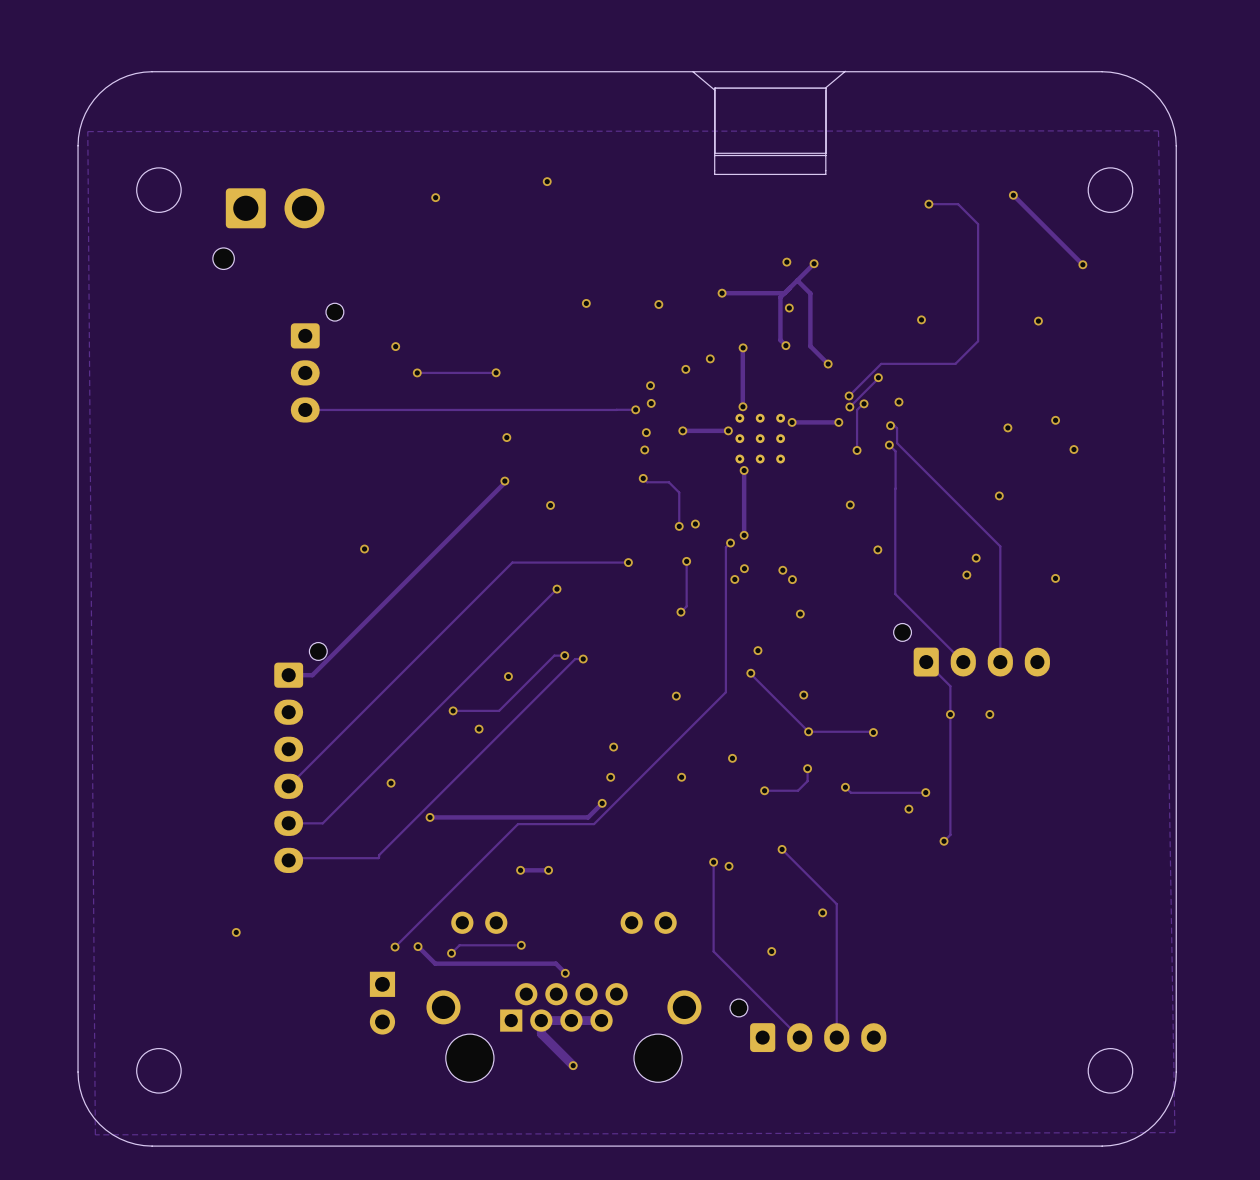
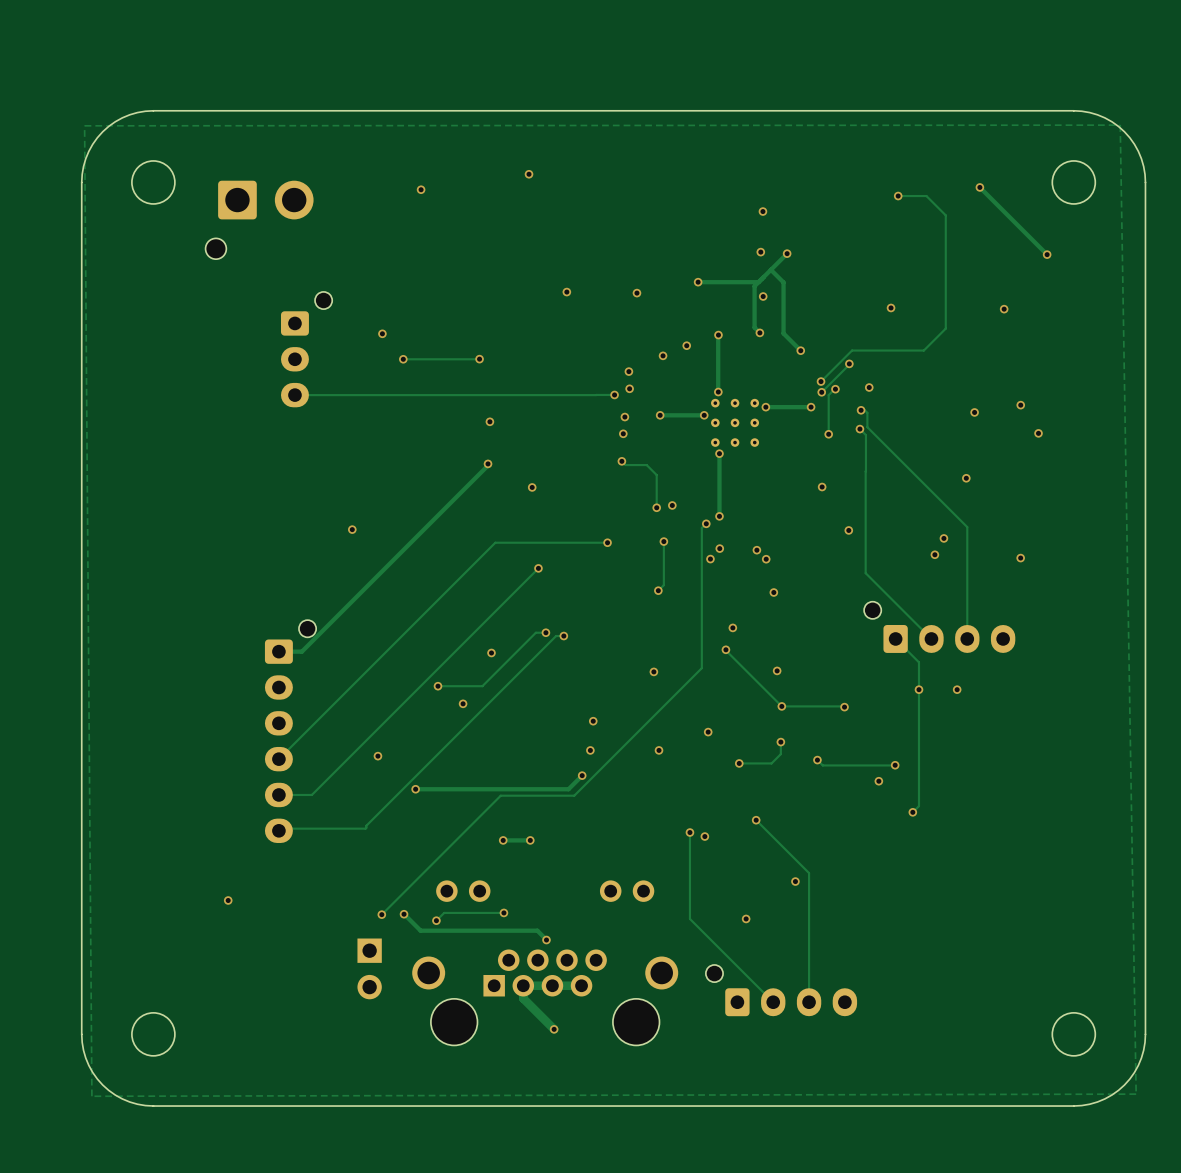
board edge: (692, 71) (714, 90) -> none
board edge: (845, 71) (825, 87) -> none
board edge: (1102, 71) (152, 71) (135, 73) (119, 79) (99, 93) (89, 106) (82, 121) (78, 145) (78, 1072) (82, 1096) (89, 1111) (99, 1124) (119, 1138) (135, 1144) (152, 1146) (1102, 1146) (1126, 1141) (1141, 1134) (1154, 1124) (1168, 1104) (1174, 1088) (1176, 1072) (1176, 145) (1172, 121) (1164, 106) (1154, 93) (1134, 79) (1118, 73) (1102, 71) -> (1073, 110) (1089, 112) (1104, 117) (1124, 131) (1134, 144) (1141, 158) (1145, 182) (1145, 1034) (1141, 1058) (1134, 1072) (1124, 1085) (1111, 1095) (1097, 1102) (1073, 1106) (153, 1106) (137, 1104) (122, 1098) (102, 1085) (92, 1072) (85, 1058) (81, 1034) (81, 182) (83, 166) (88, 151) (102, 131) (115, 121) (129, 114) (153, 110) (1073, 110)
board edge: (825, 90) (825, 174) (714, 174) (714, 90) -> none
part: (770, 120) -> none
board edge: (825, 155) (714, 155) -> none
via: none -> (762, 211)

